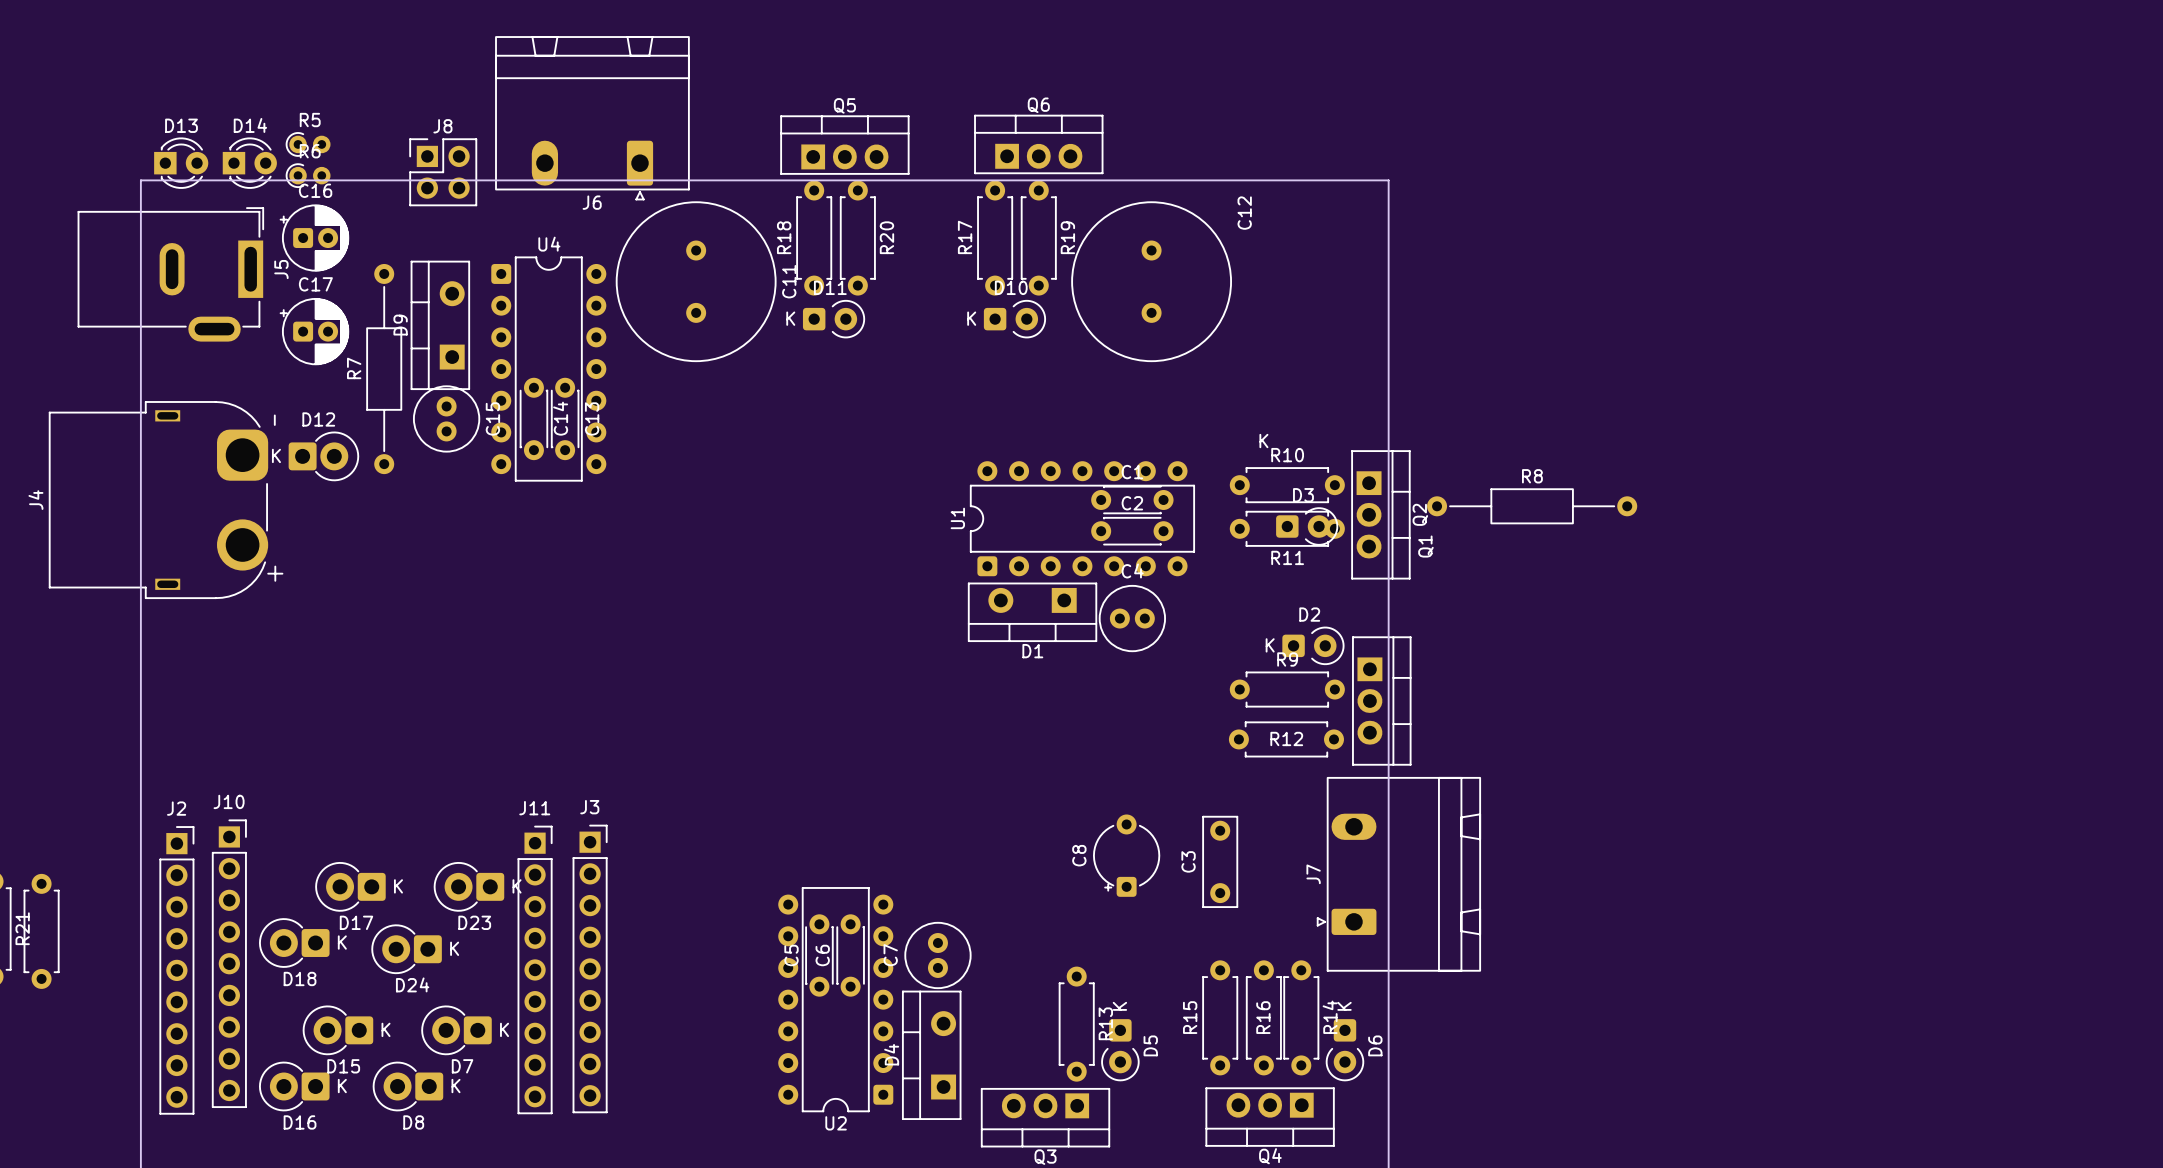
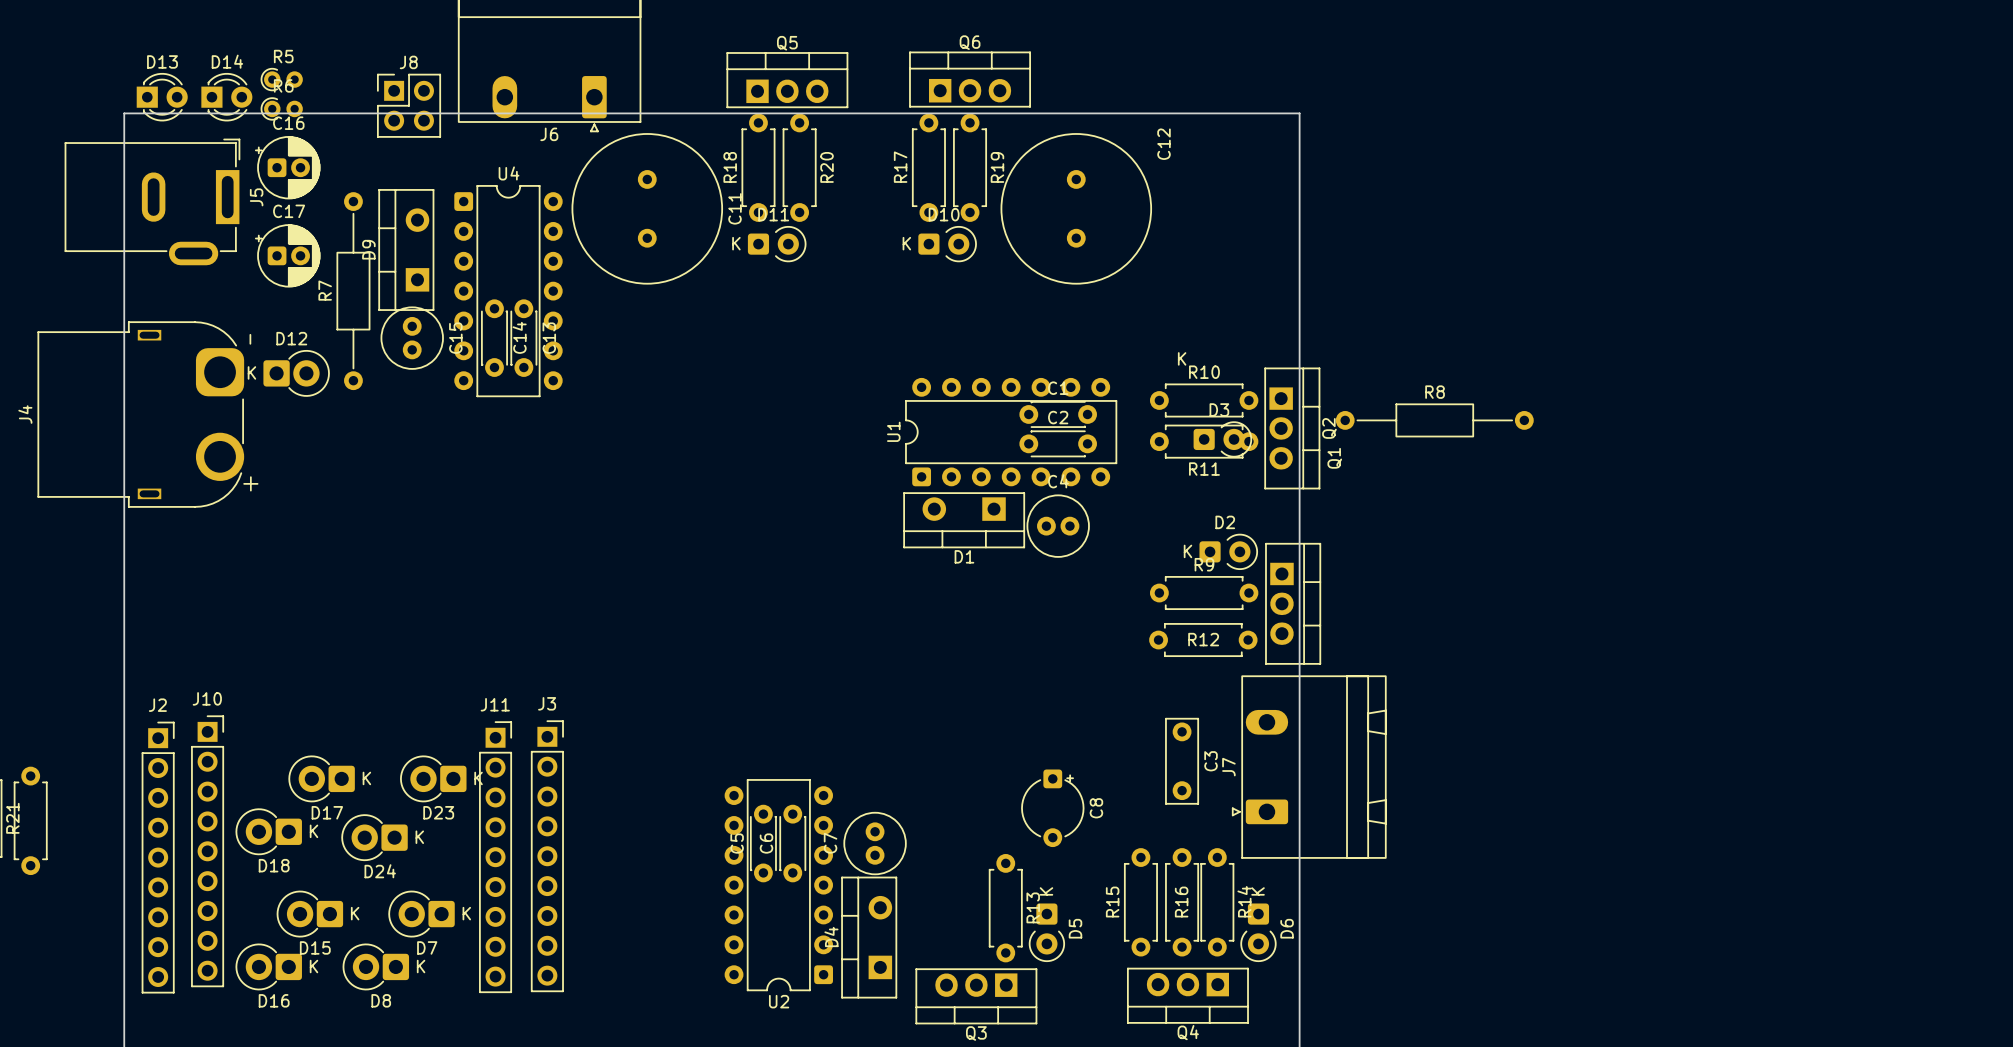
C8 rotation: 0° (1126, 855) -> 180° (1052, 808)
C8 position: (1126, 855) -> (1052, 808)
C3 name position: C3 (1188, 861) -> C3 (1211, 761)
C3 position: (1220, 861) -> (1182, 761)

